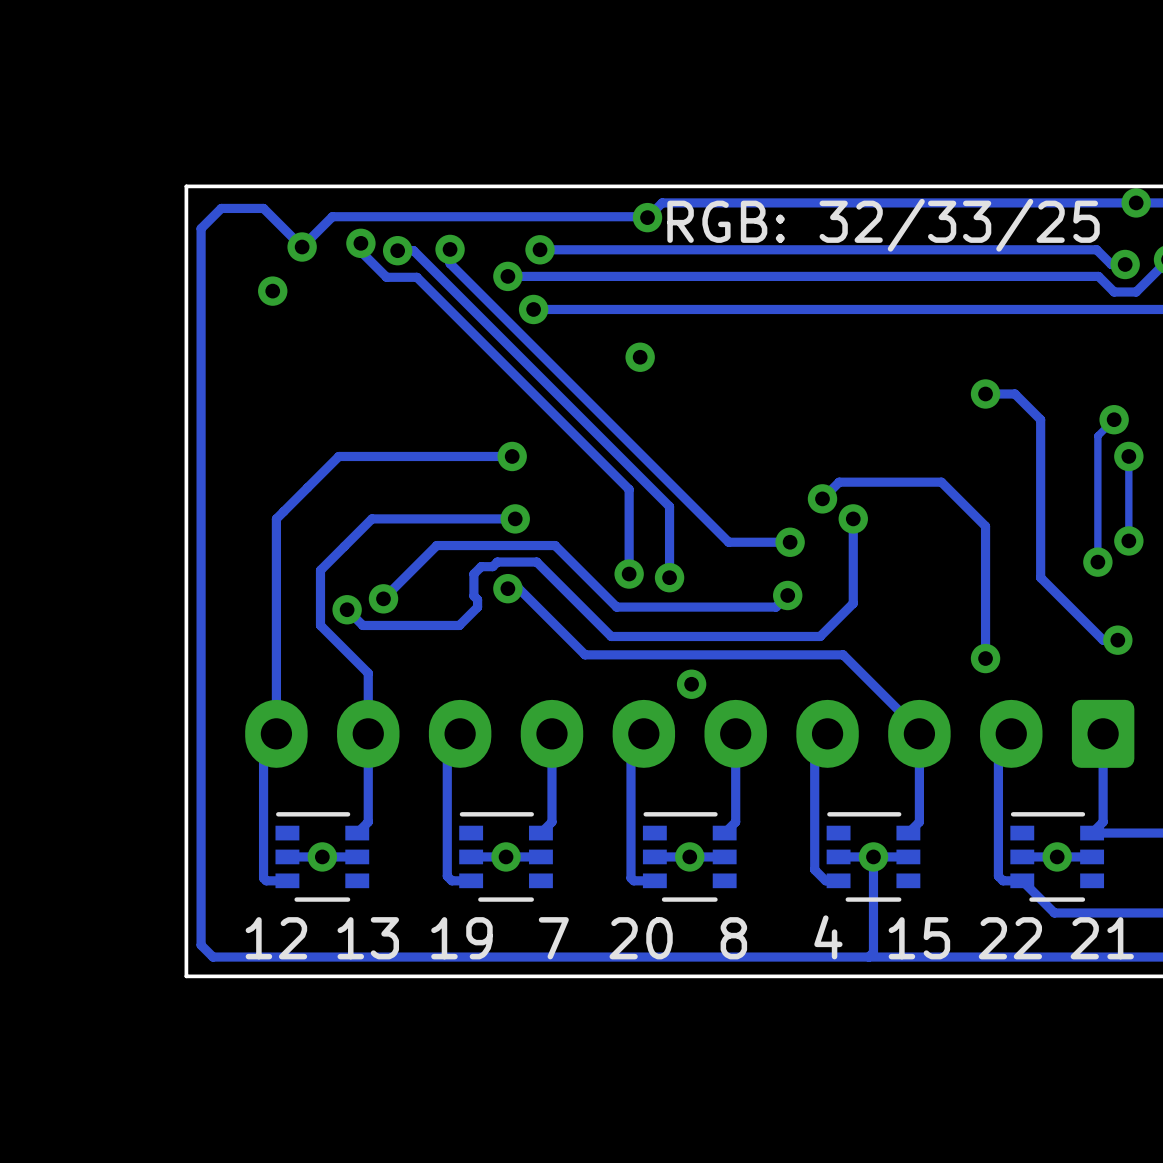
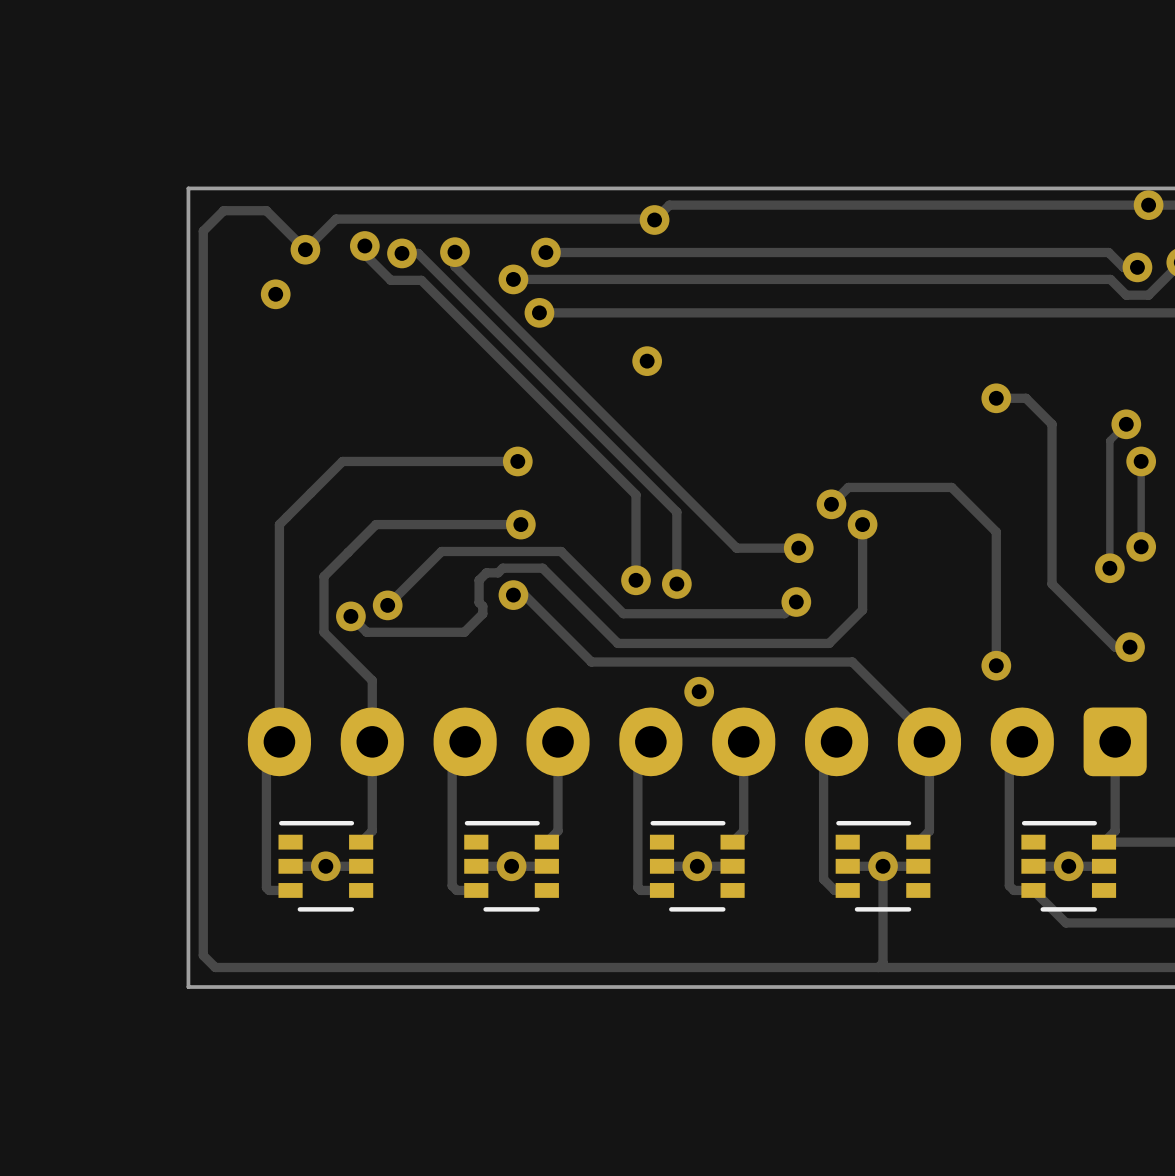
text: RGB: 32/33/25 (883, 225) -> none
text: 4 (828, 937) -> none
text: 12 (276, 938) -> none
text: 13 (368, 938) -> none
text: 19 (461, 938) -> none
text: 7 (553, 938) -> none
text: 20 (641, 938) -> none
text: 8 (733, 938) -> none
text: 15 (919, 938) -> none
text: 22 (1010, 938) -> none
text: 21 (1102, 938) -> none

